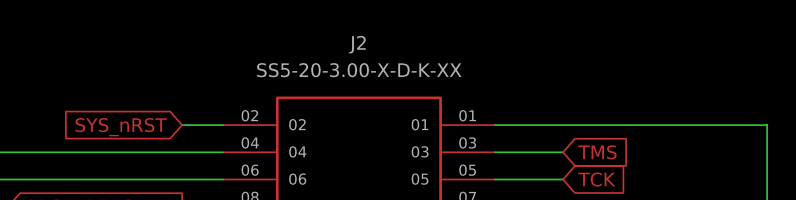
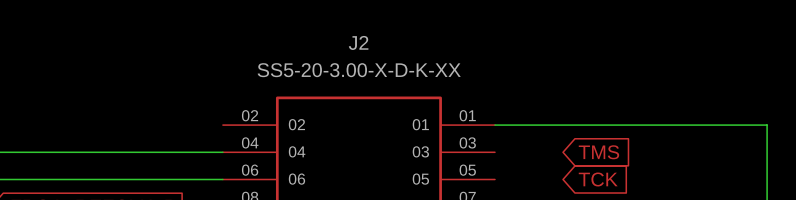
wire: (182, 125) (222, 125) -> none
global label: SYS_nRST (121, 127) -> none
wire: (495, 152) (563, 152) -> none
wire: (495, 179) (563, 179) -> none

